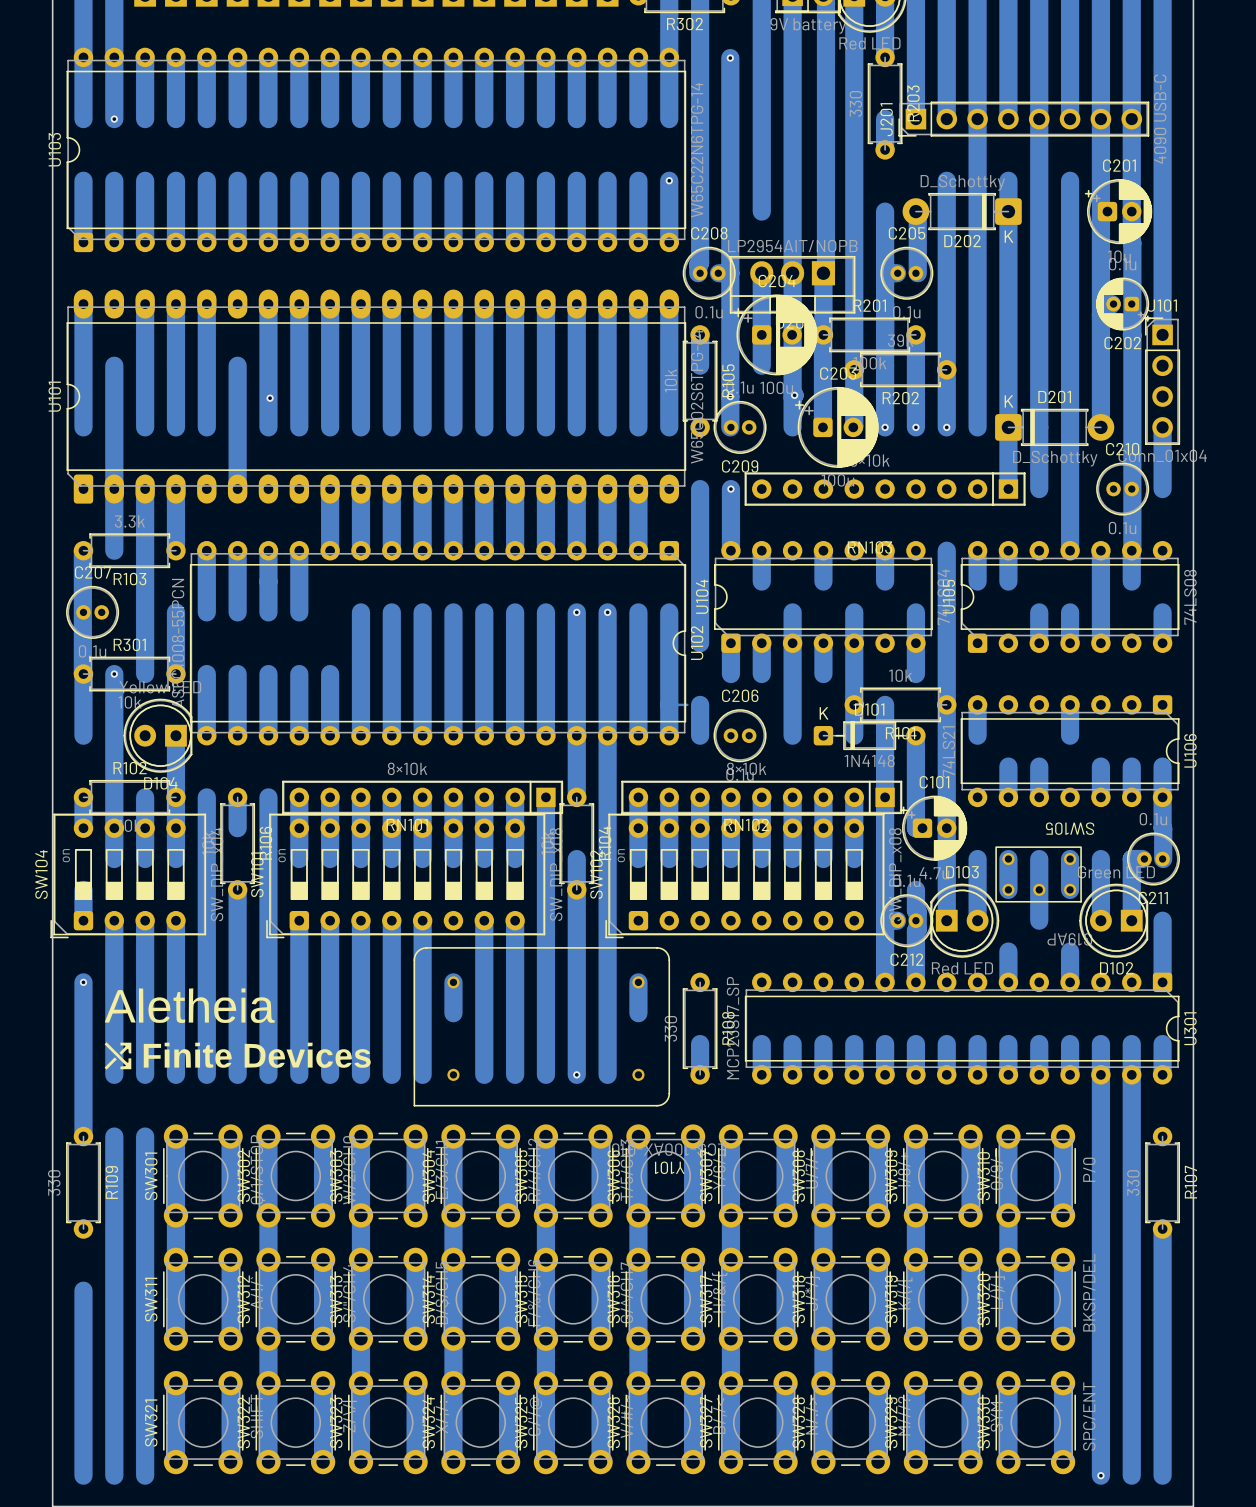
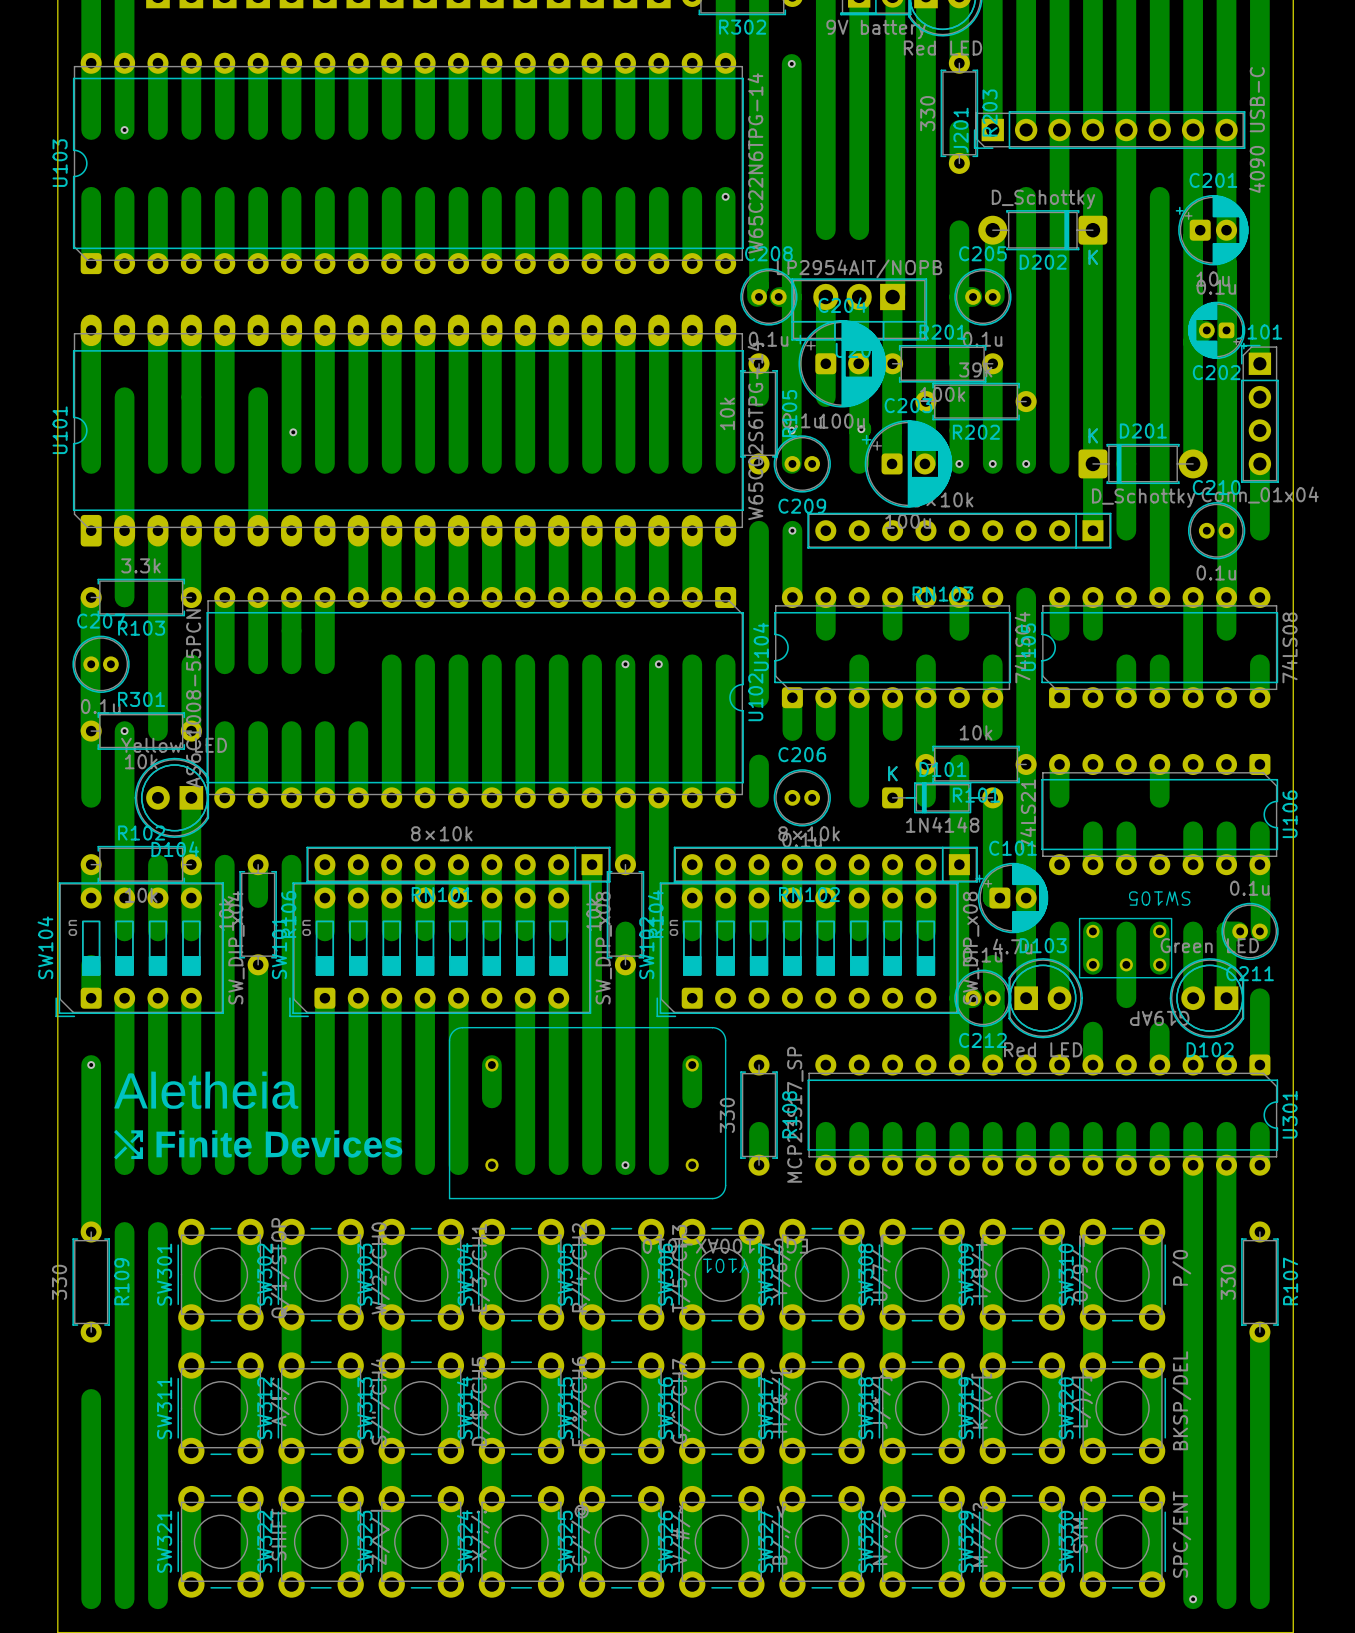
bottom track: (792, 211) (792, 273) -> none
bottom track: (669, 704) (687, 704) -> none

